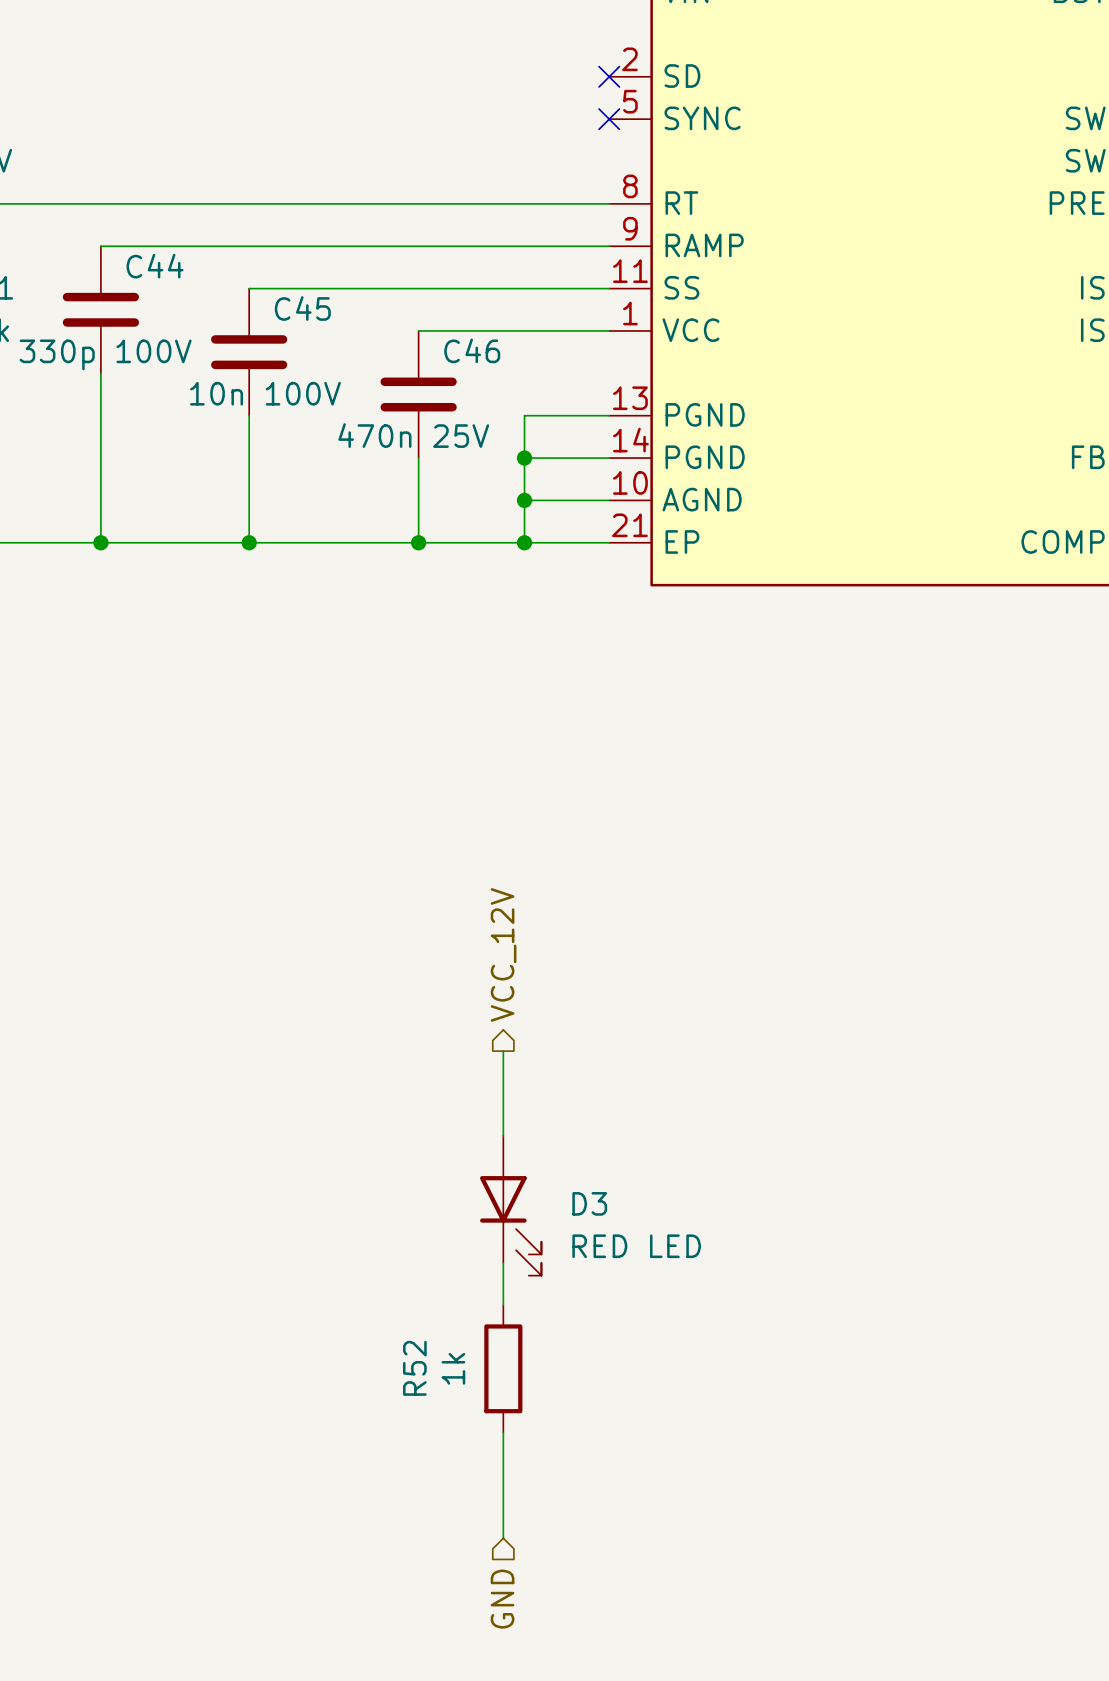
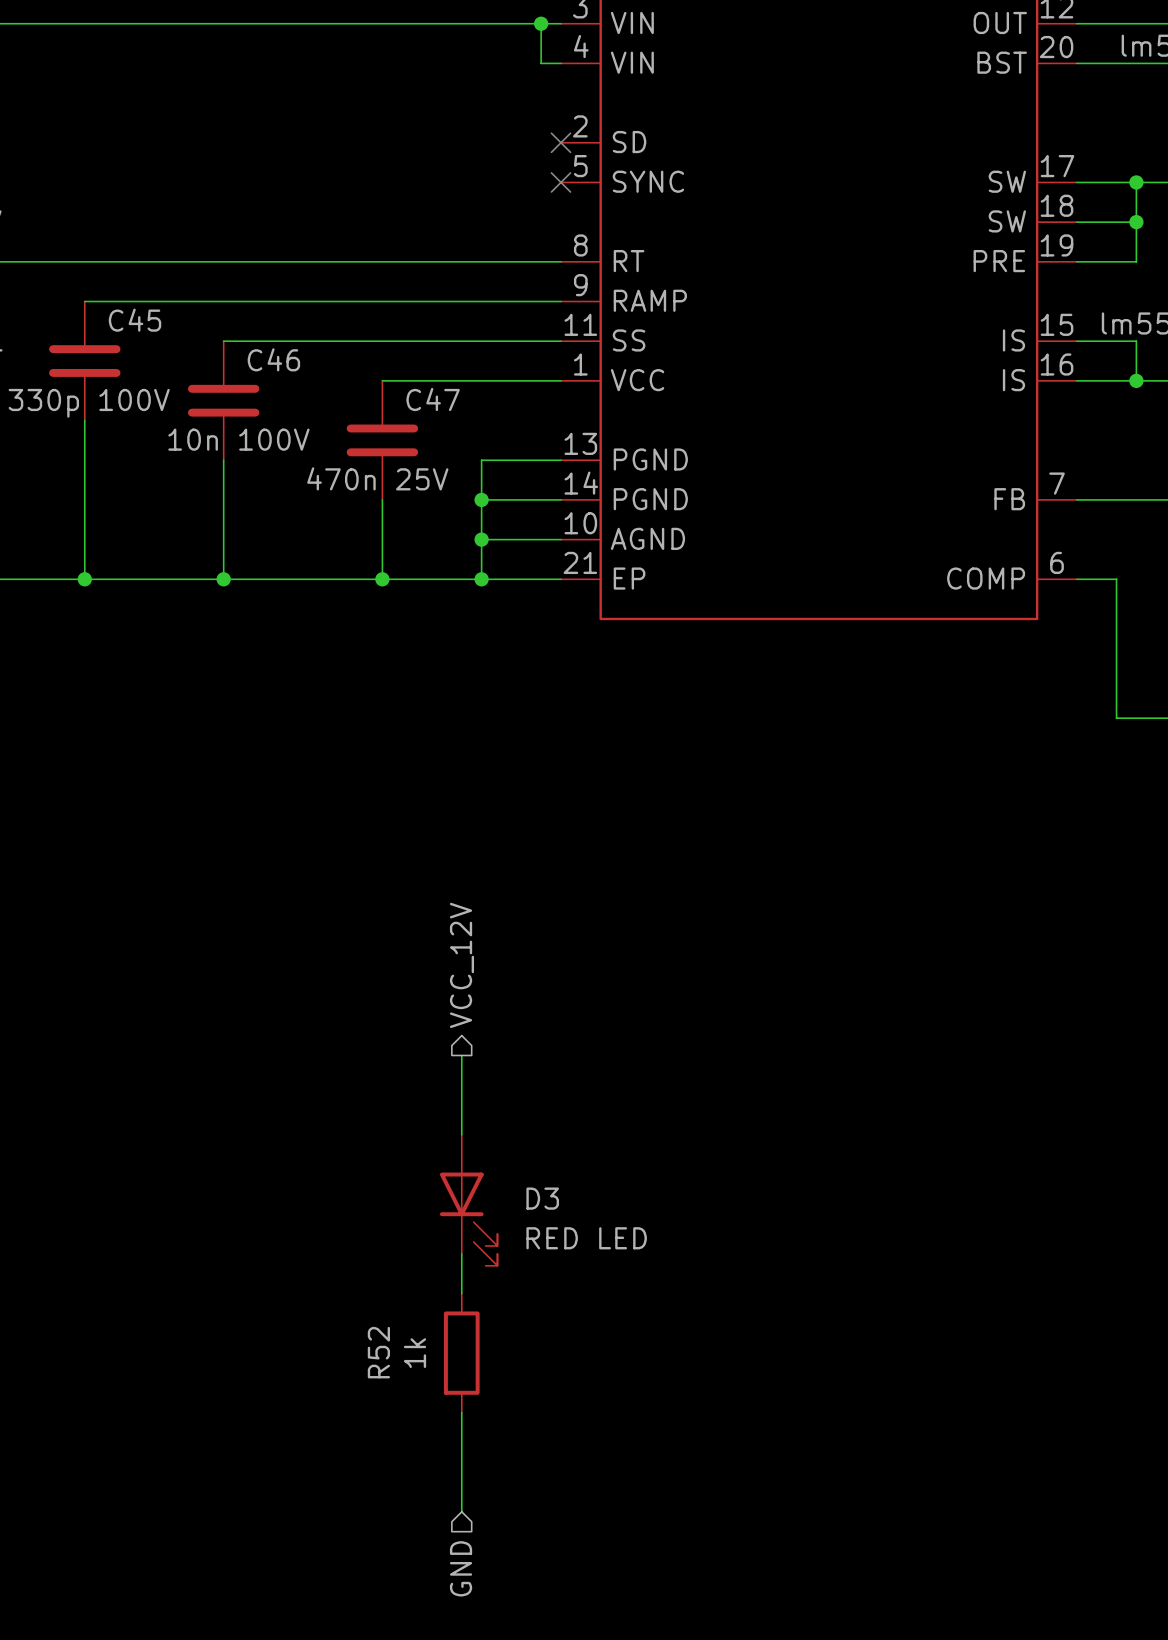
C44 name: C44 (155, 266) -> C45 (135, 320)
C45 name: C45 (302, 308) -> C46 (273, 359)
C46 name: C46 (472, 350) -> C47 (433, 399)

